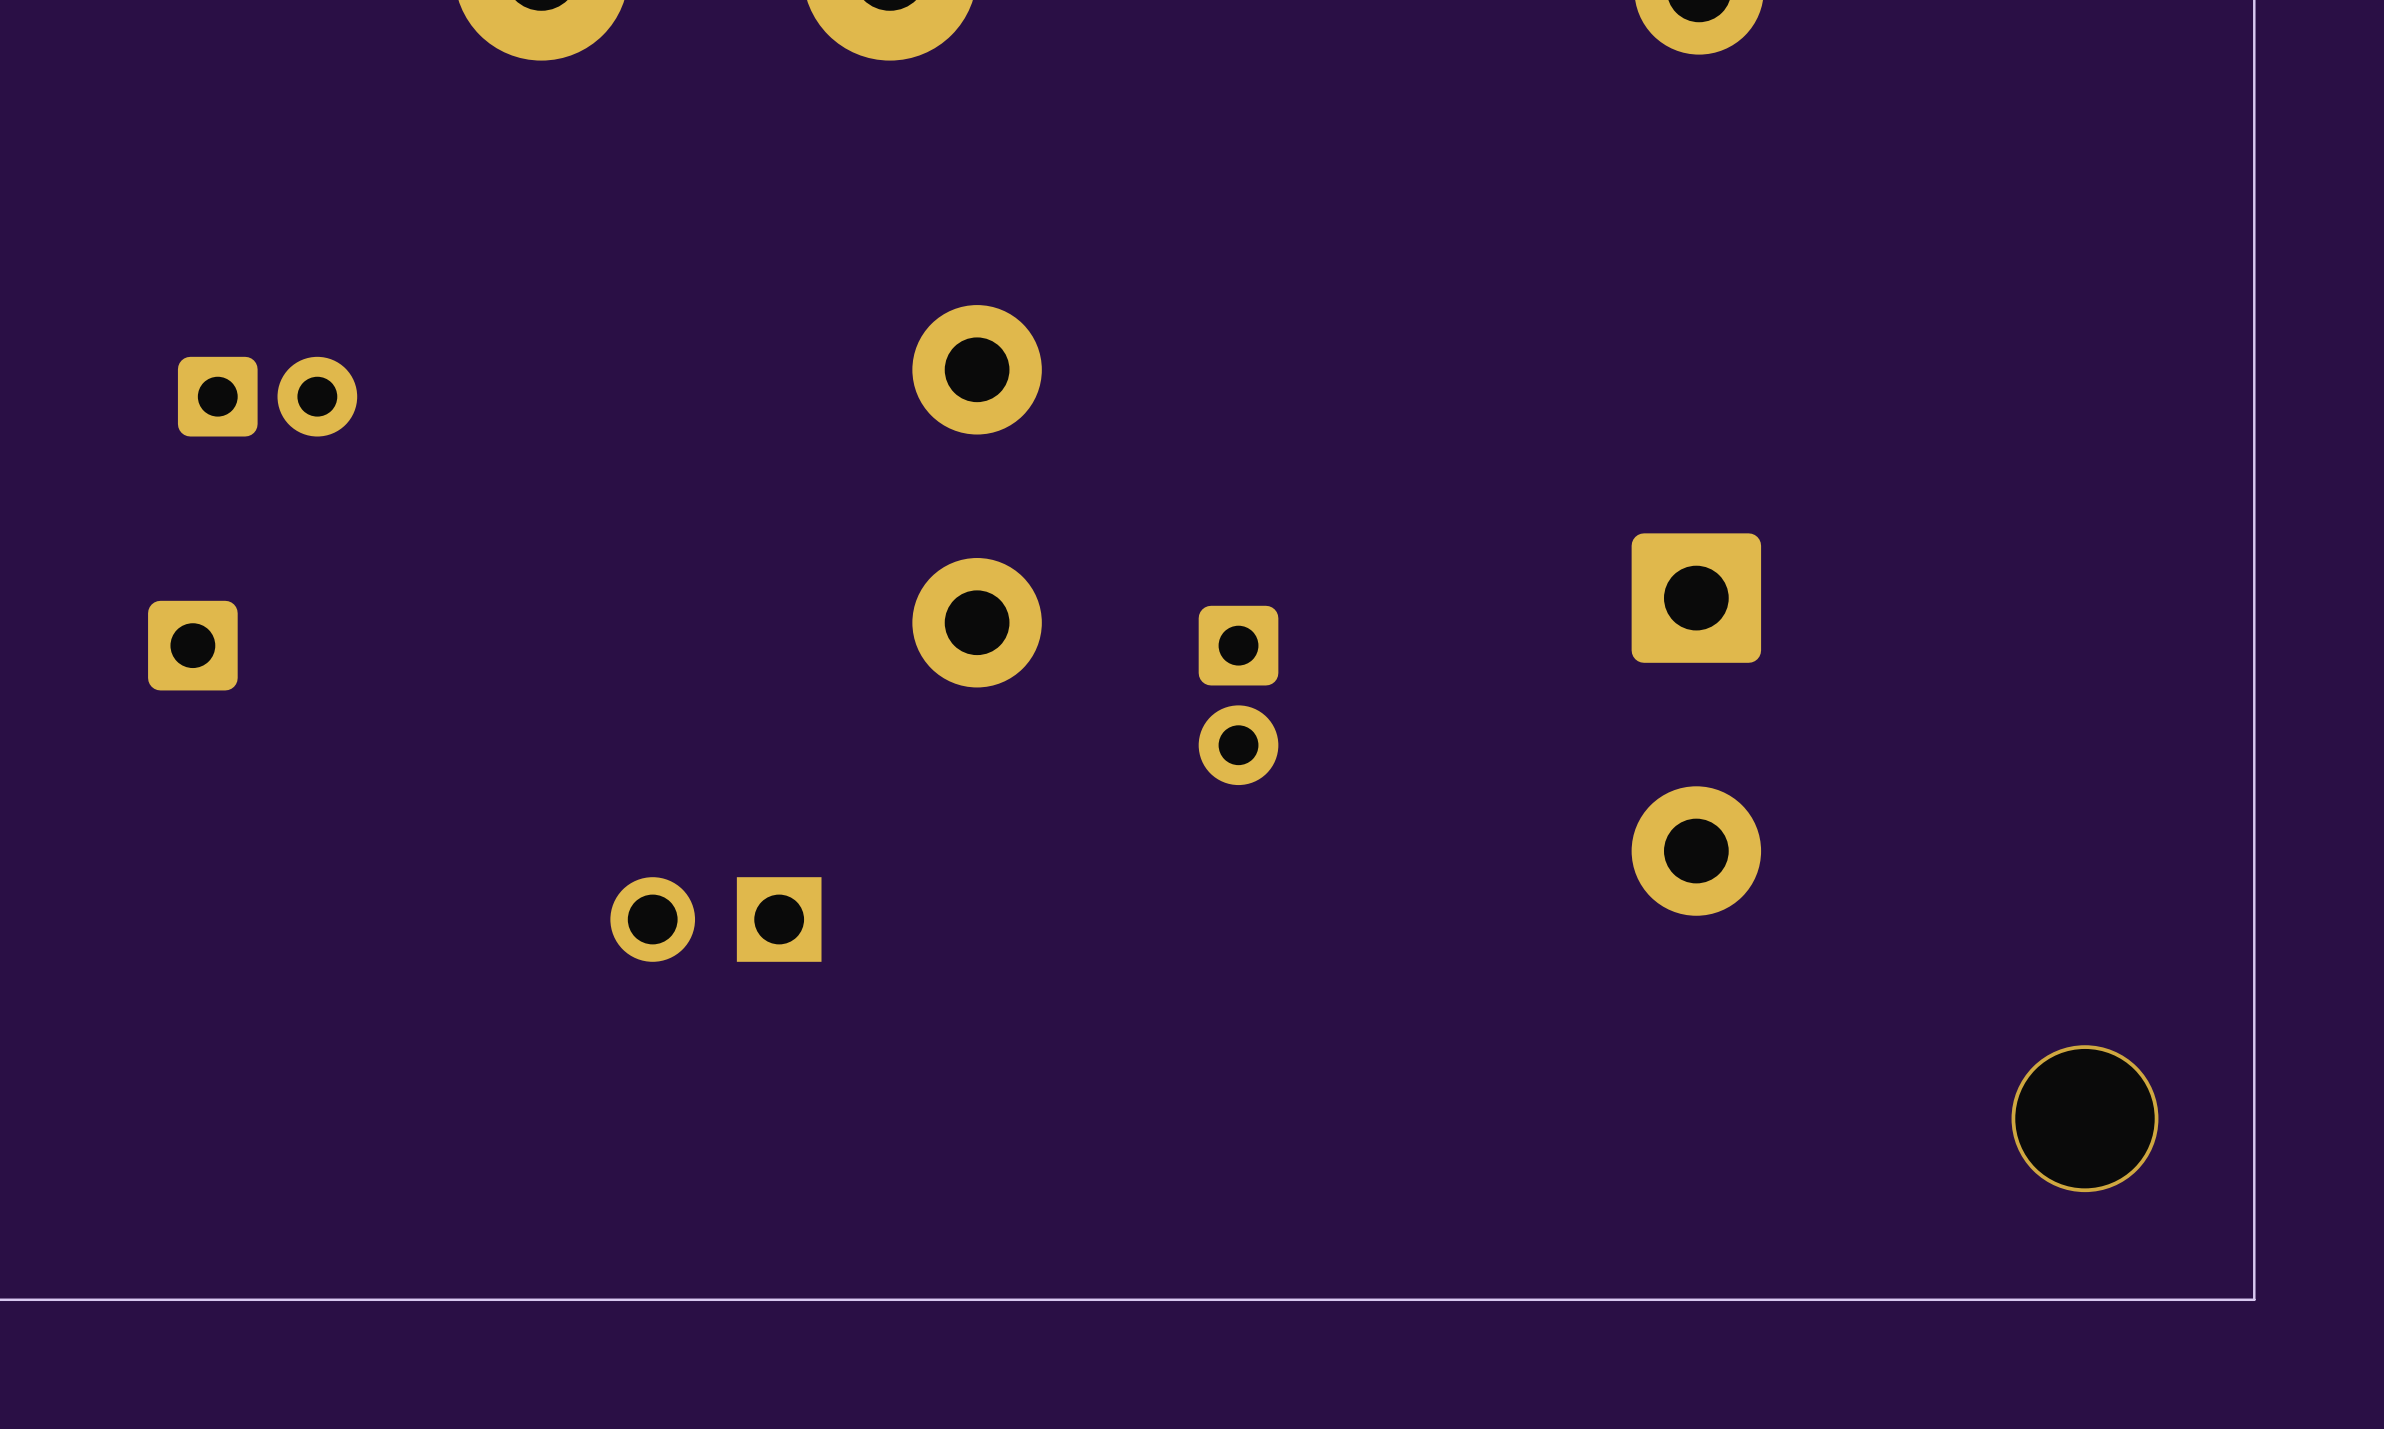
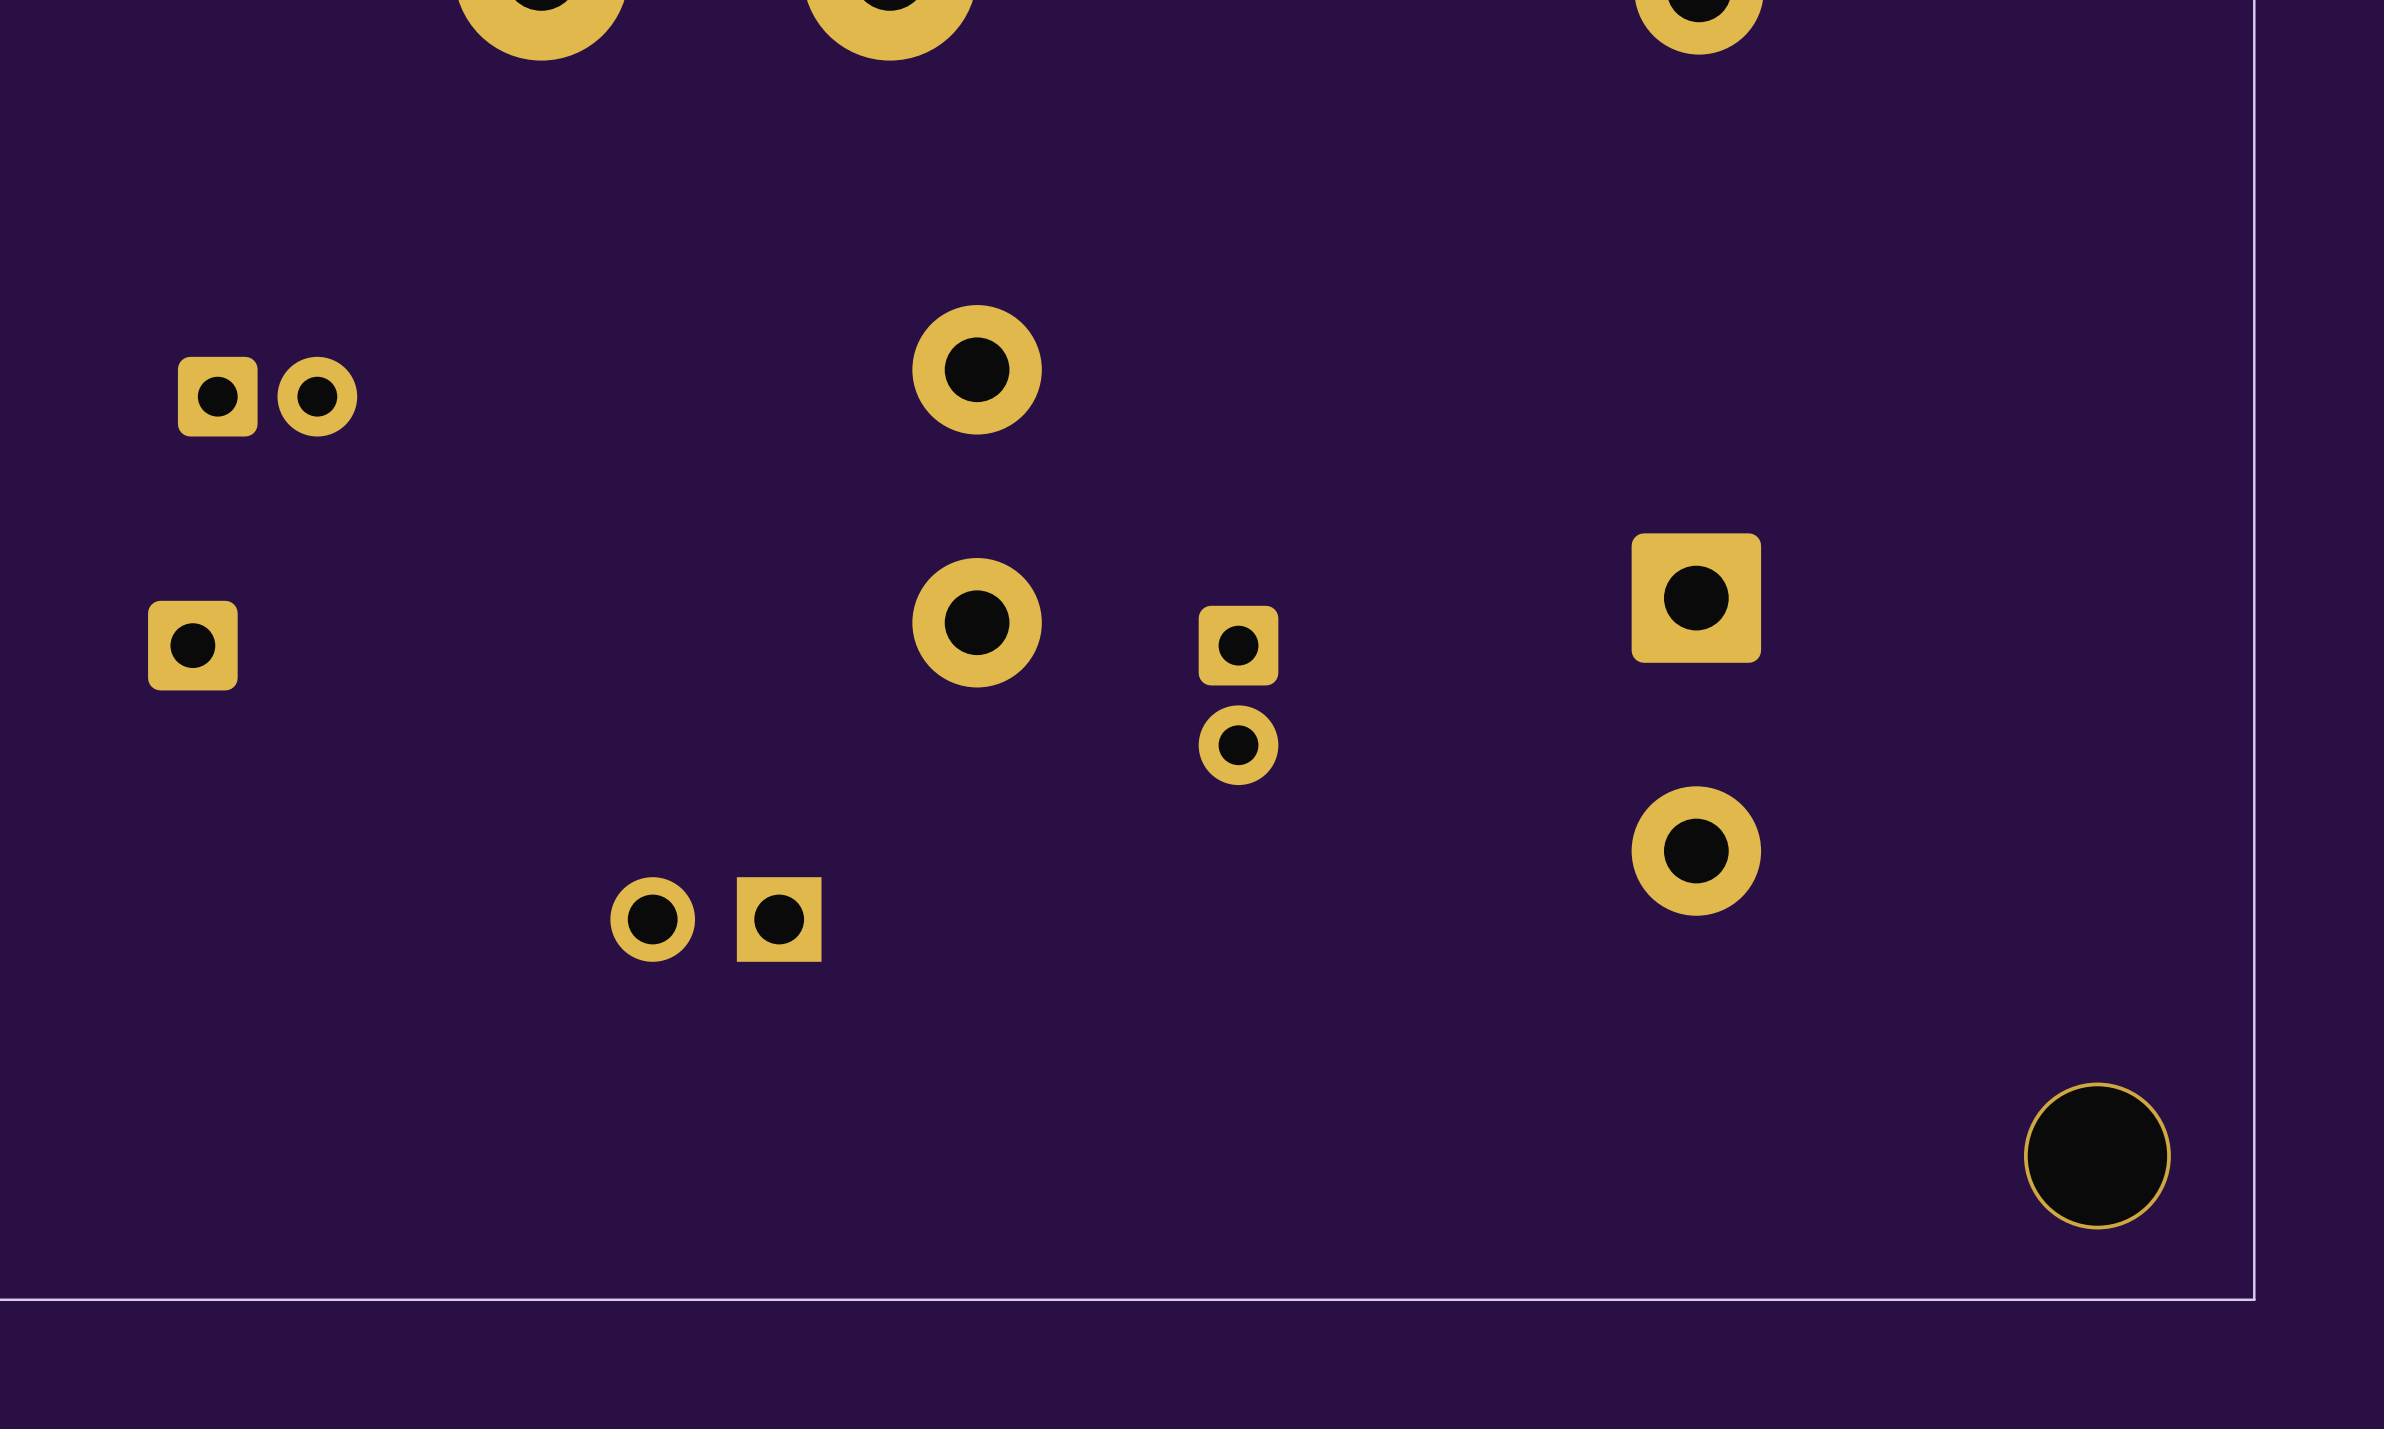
via position: (2084, 1118) -> (2097, 1156)

